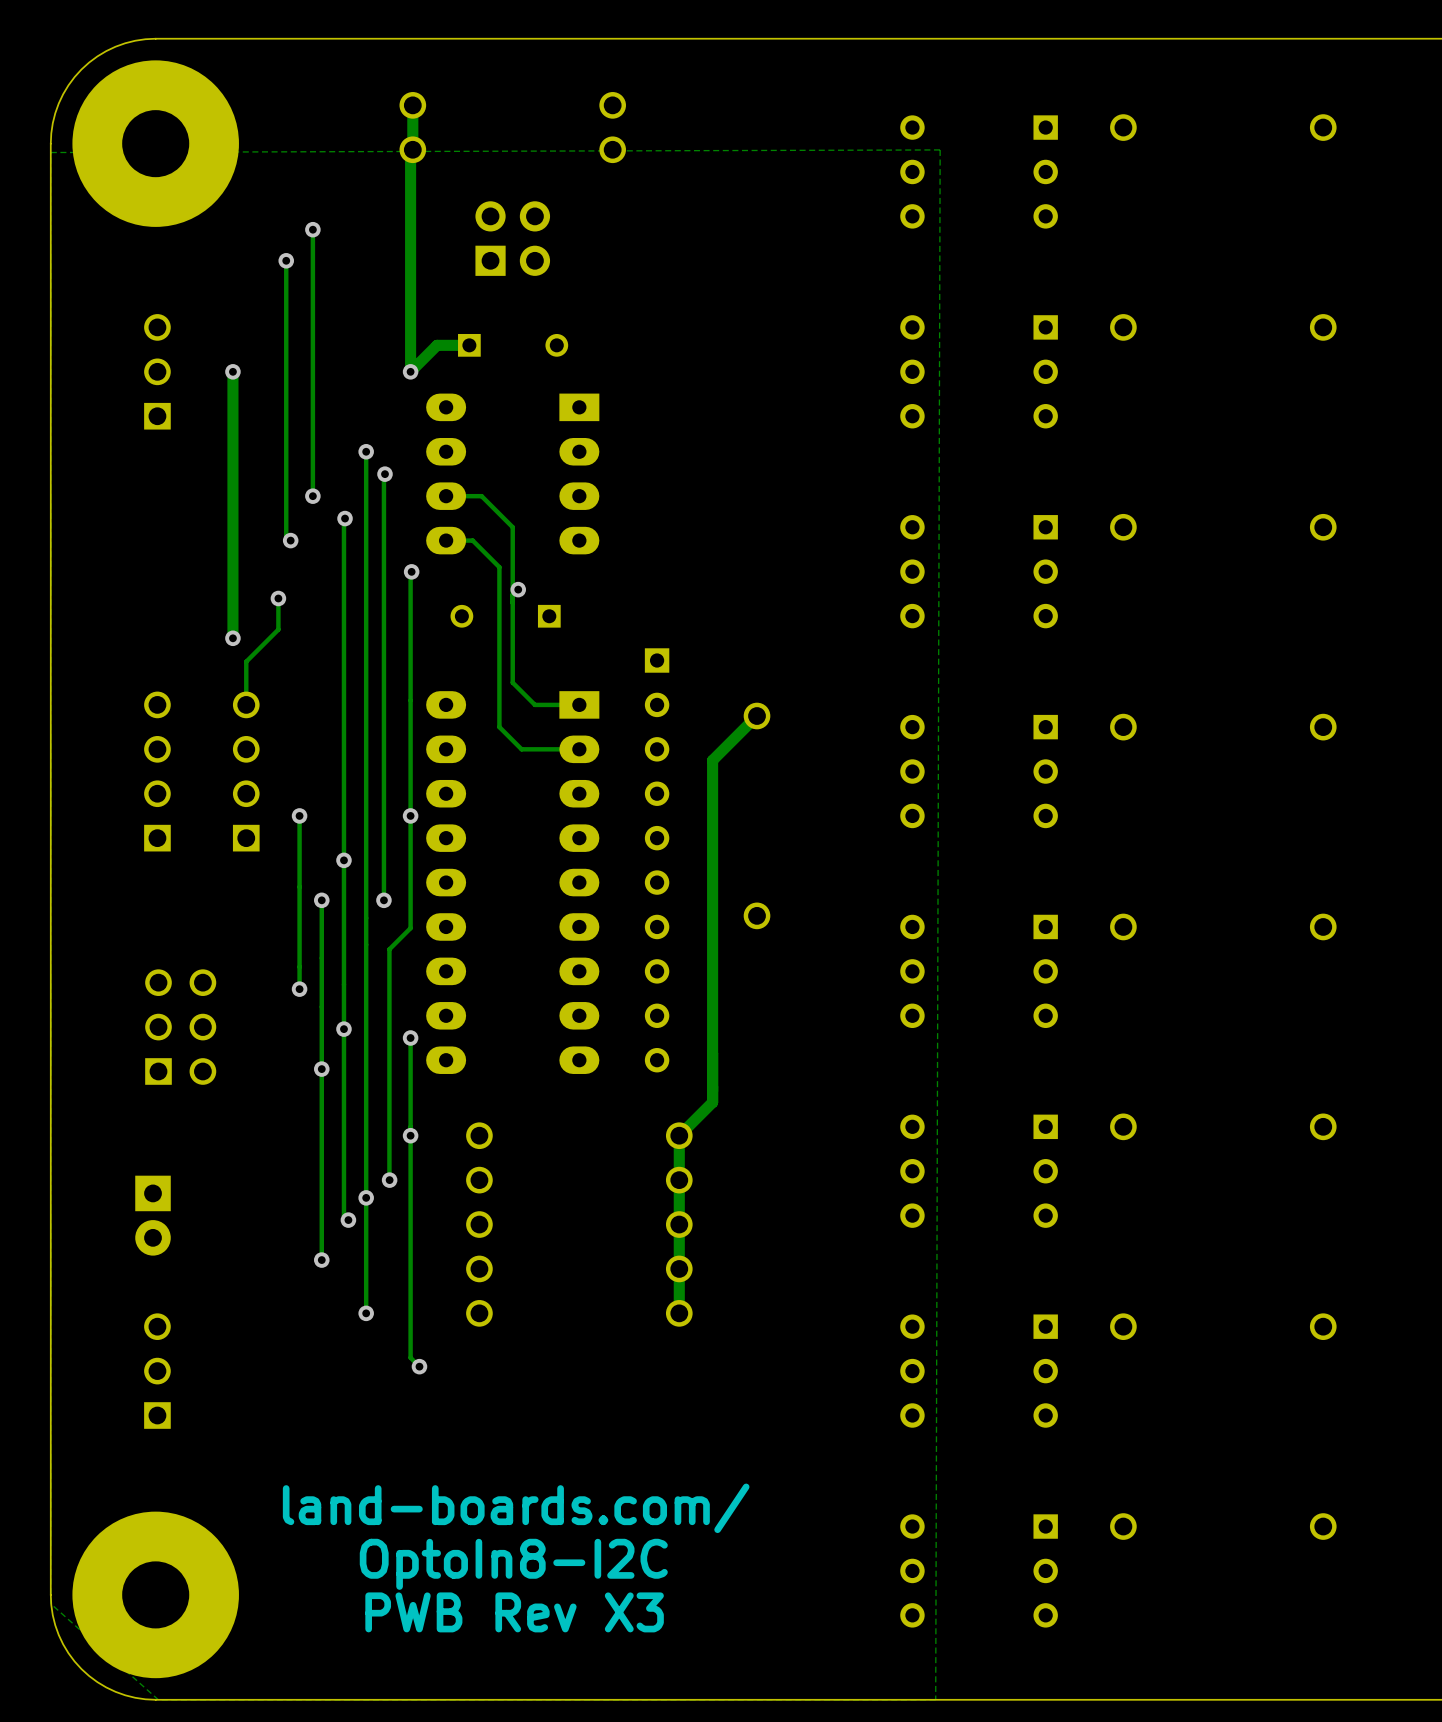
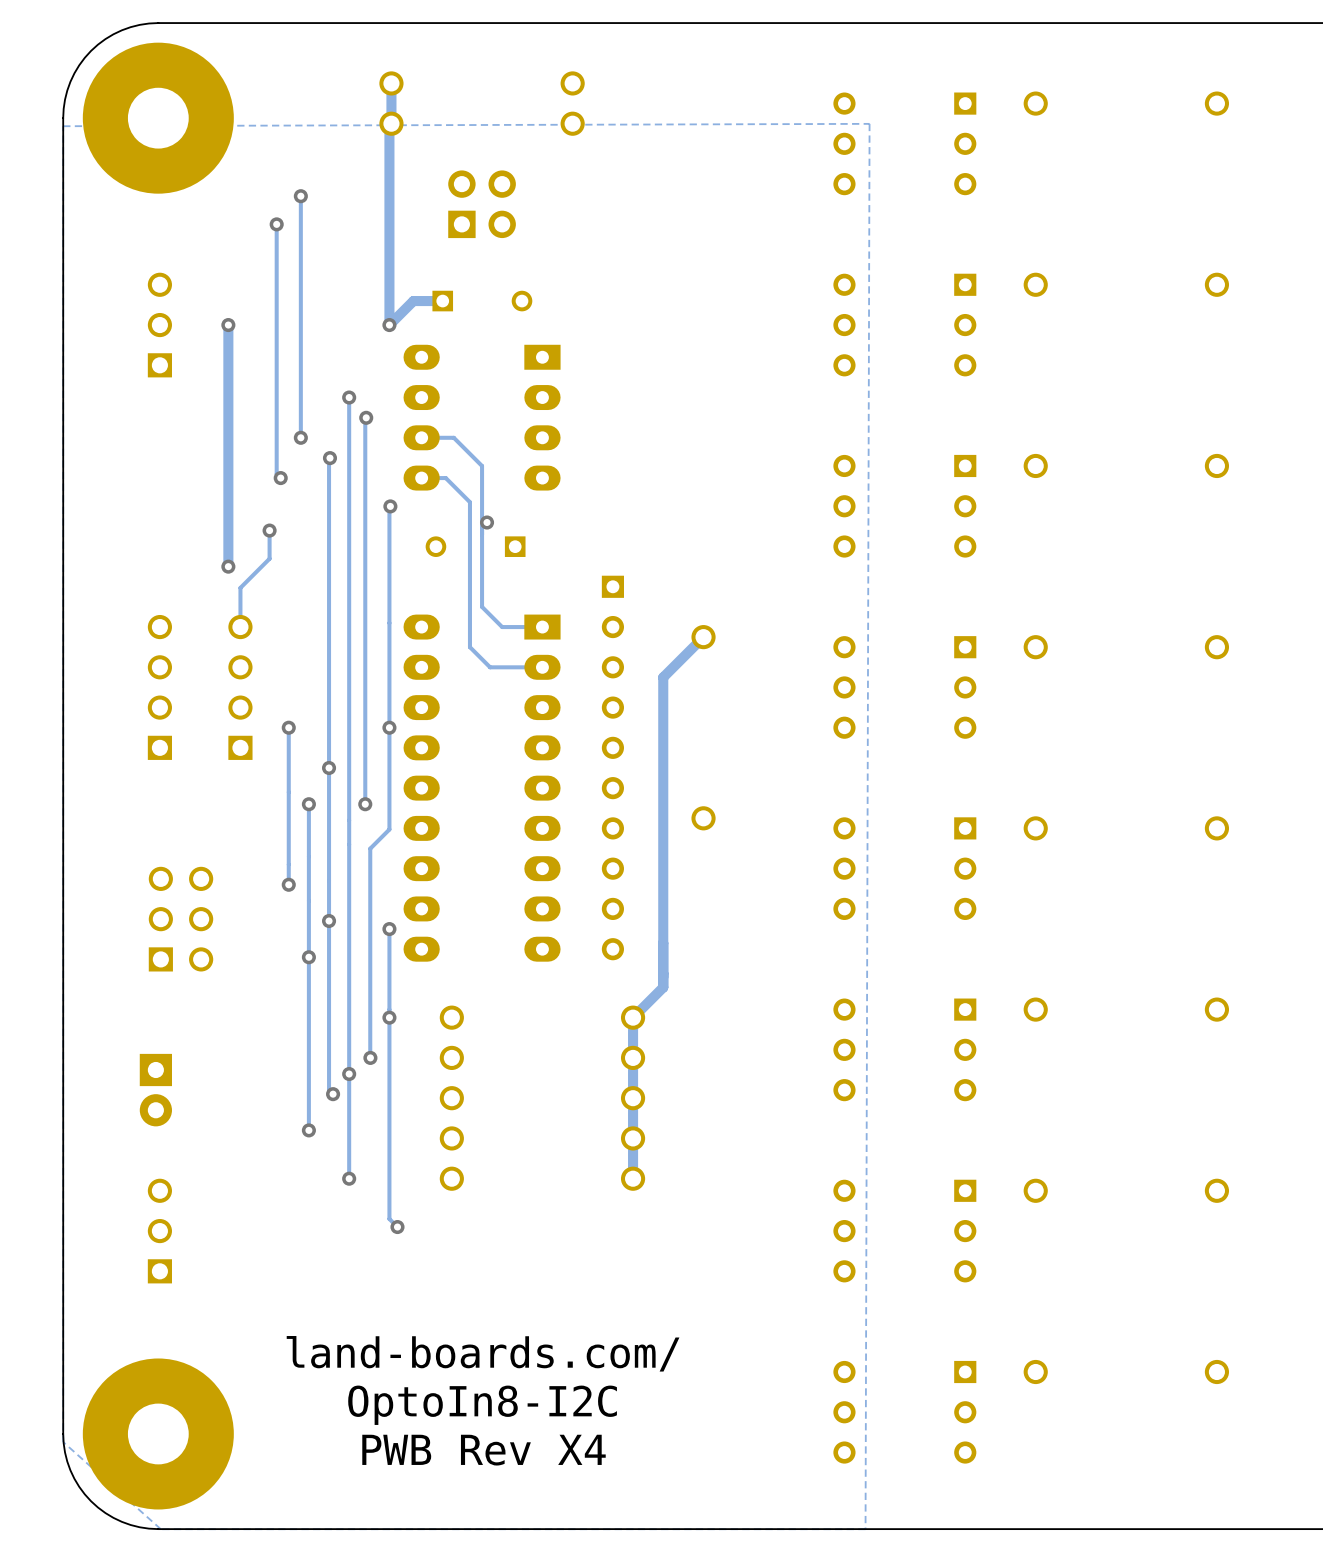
text: PWB Rev X3 (514, 1612) -> PWB Rev X4 (484, 1450)

